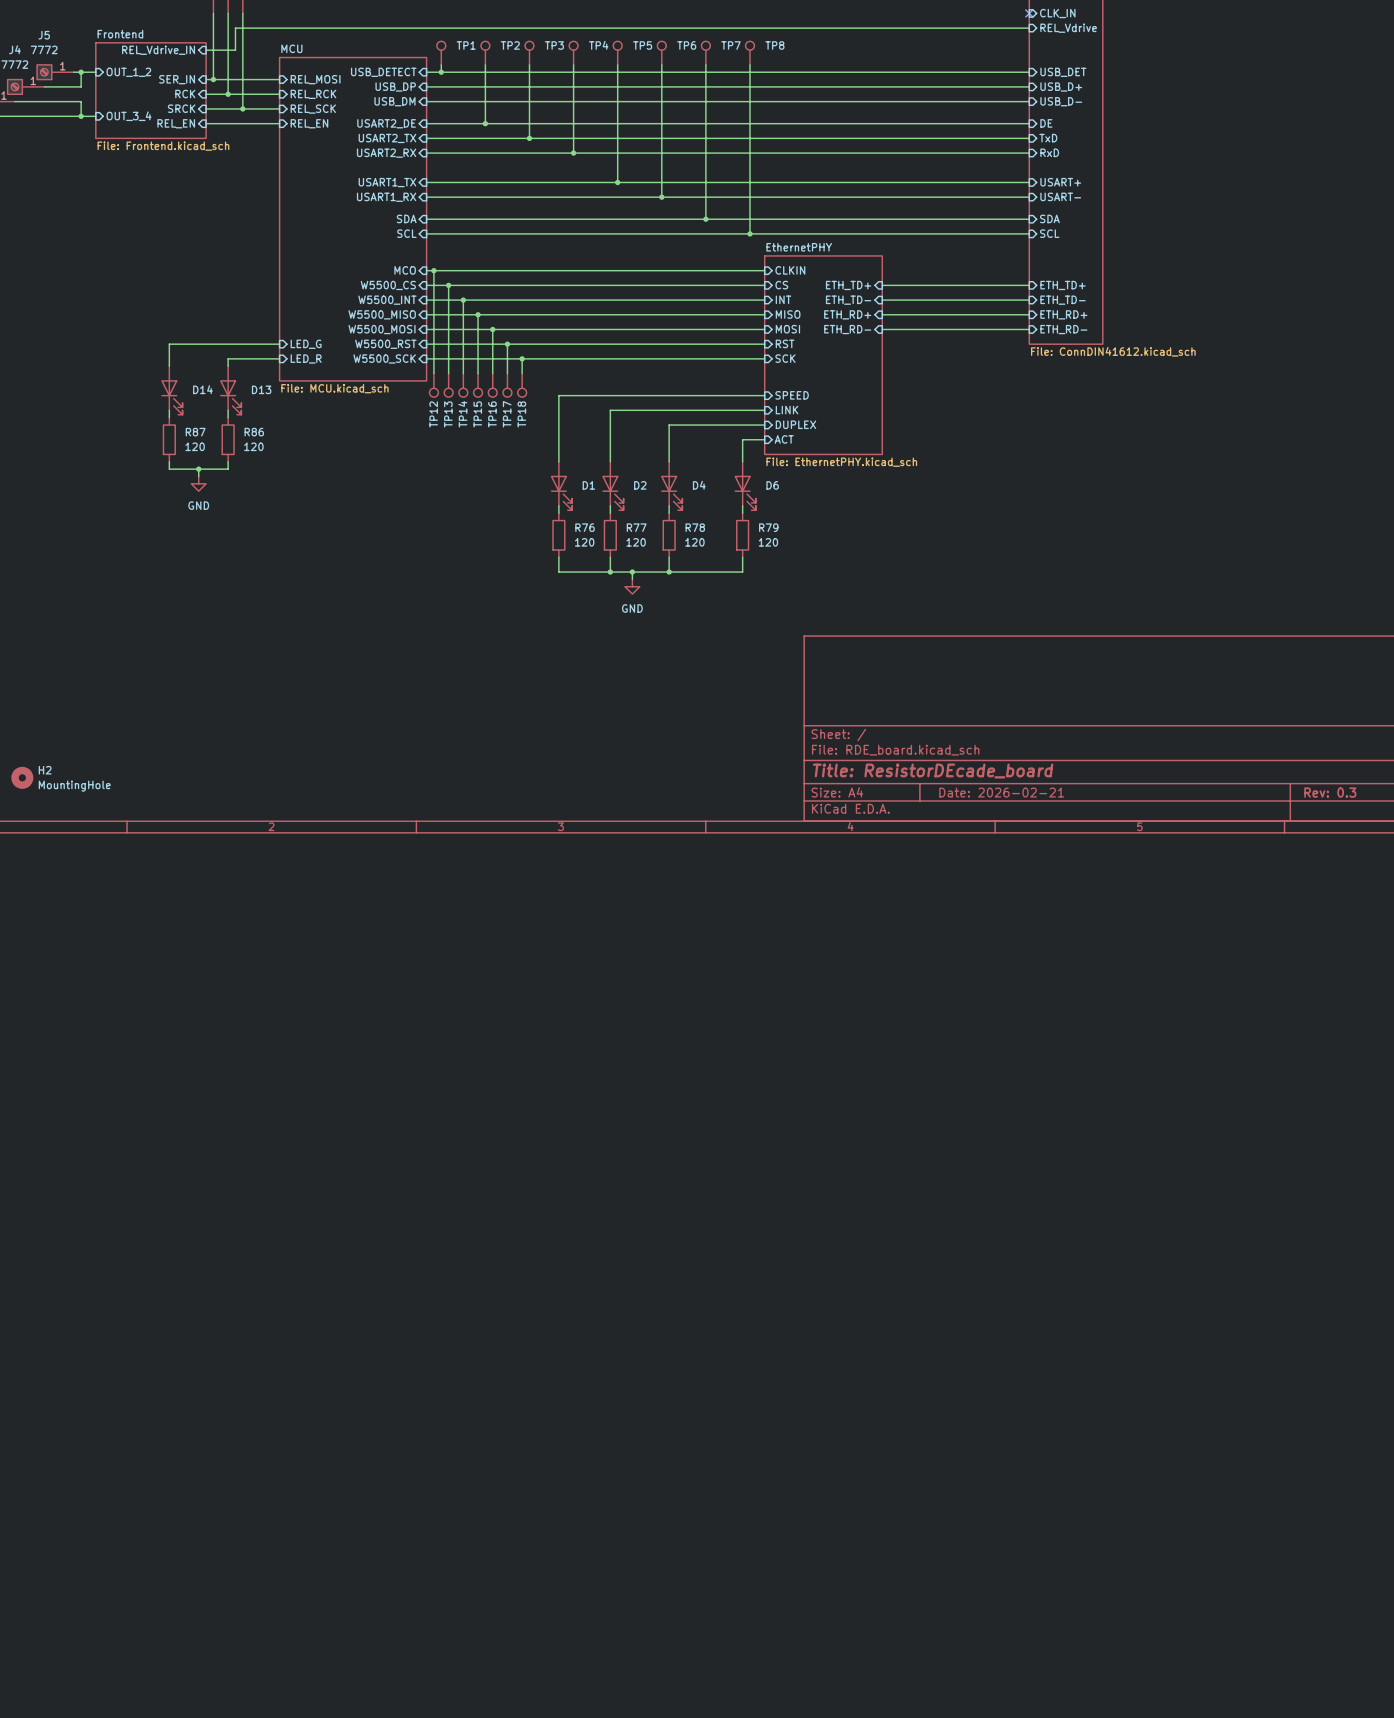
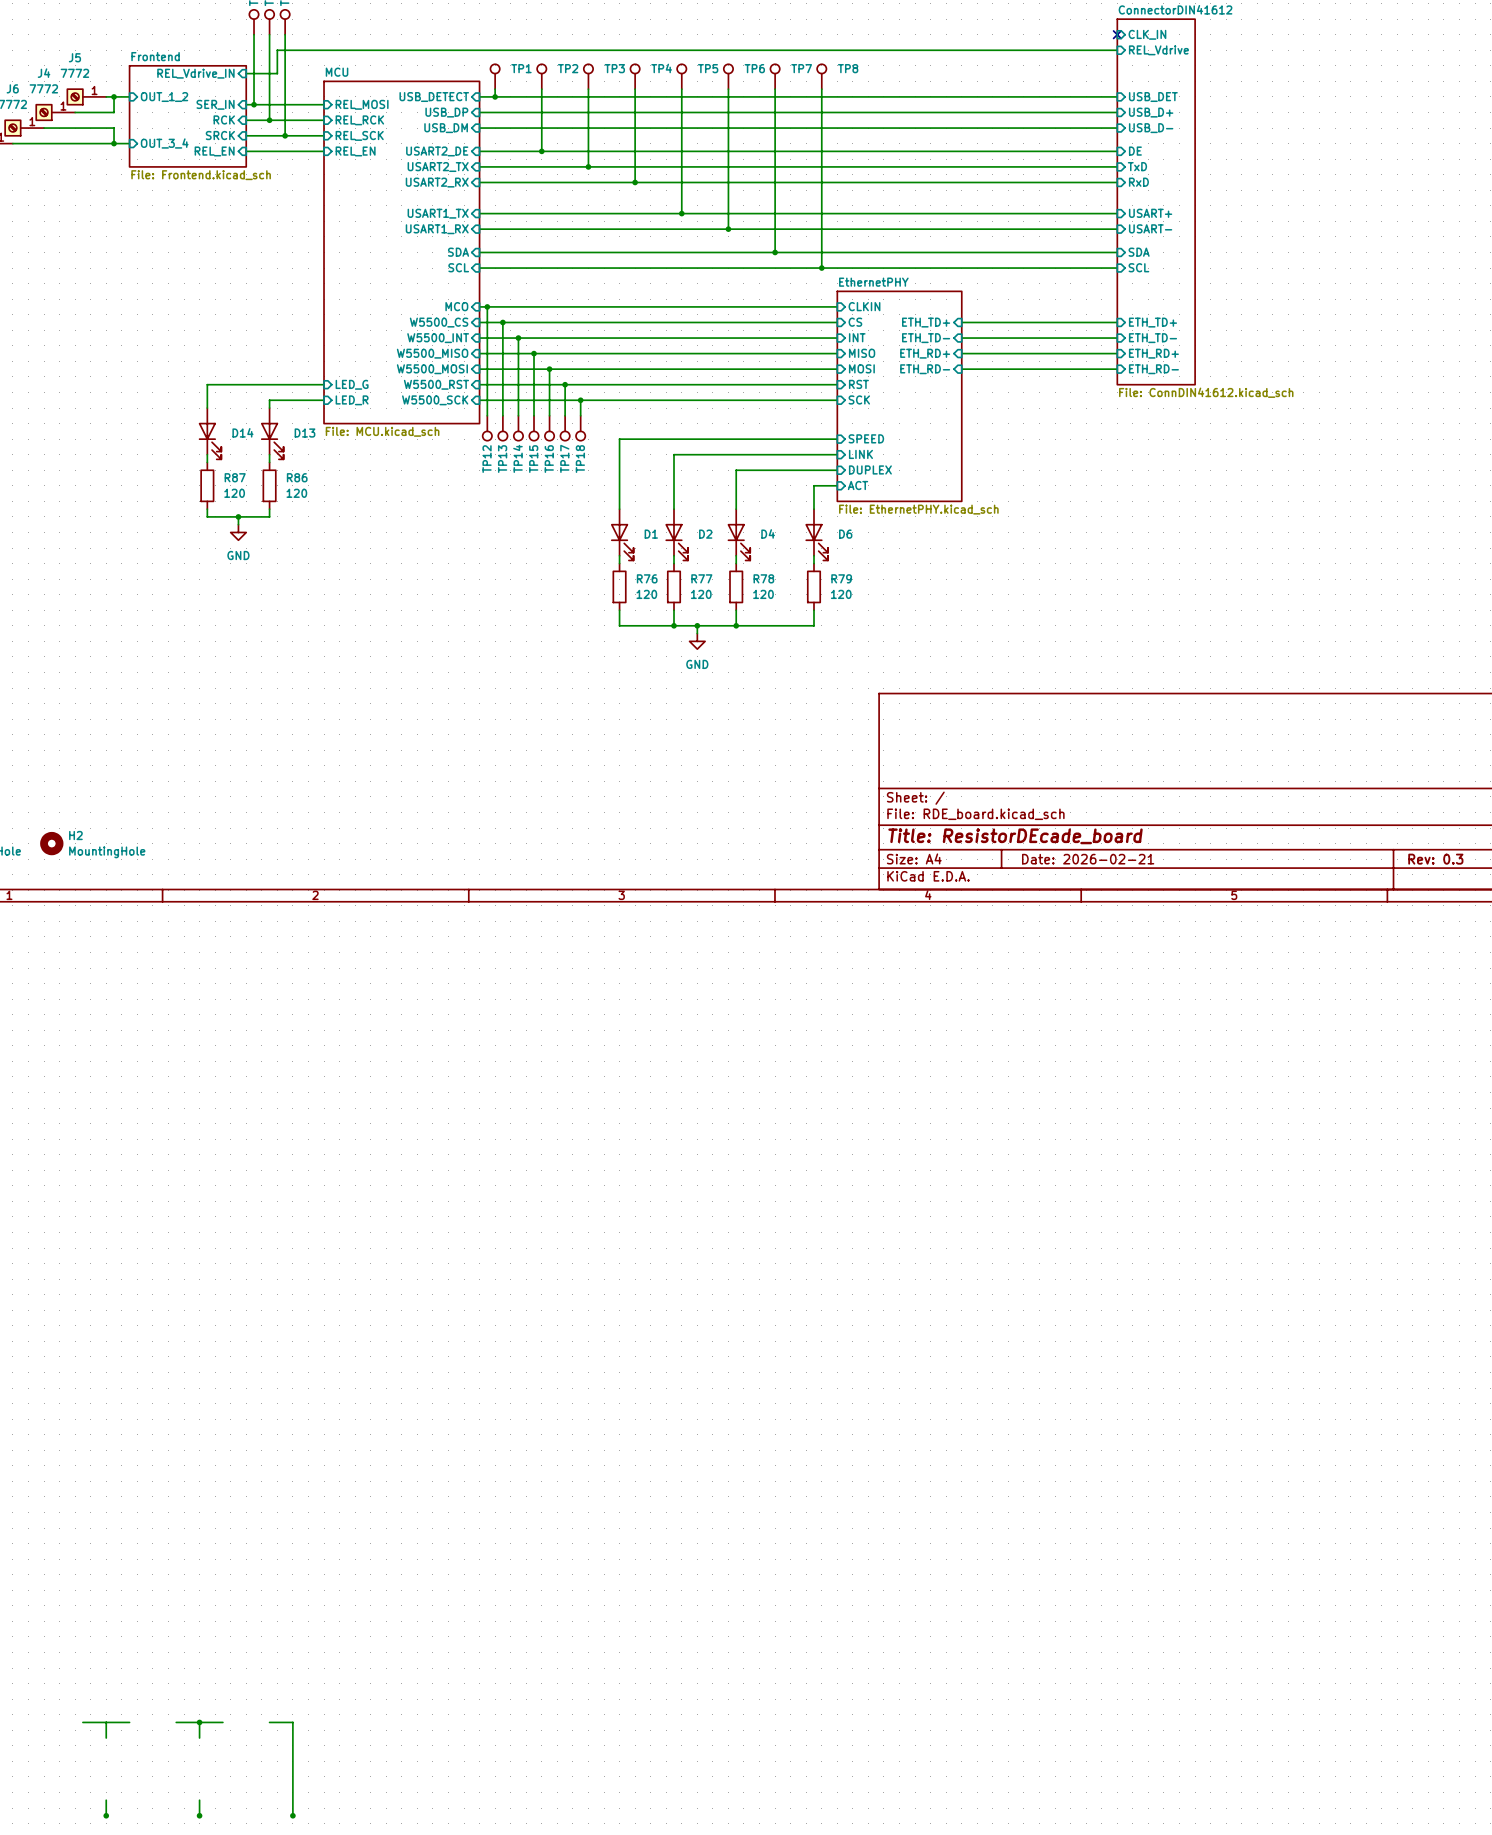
wire: none -> (82, 1722) (129, 1722)
wire: none -> (106, 1722) (106, 1738)
wire: none -> (176, 1722) (222, 1722)
wire: none -> (199, 1722) (199, 1738)
junction: none -> (199, 1722)
wire: none -> (269, 1722) (292, 1722) (292, 1815)
wire: none -> (106, 1800) (106, 1815)
wire: none -> (199, 1800) (199, 1815)
junction: none -> (106, 1815)
junction: none -> (199, 1815)
junction: none -> (292, 1815)

